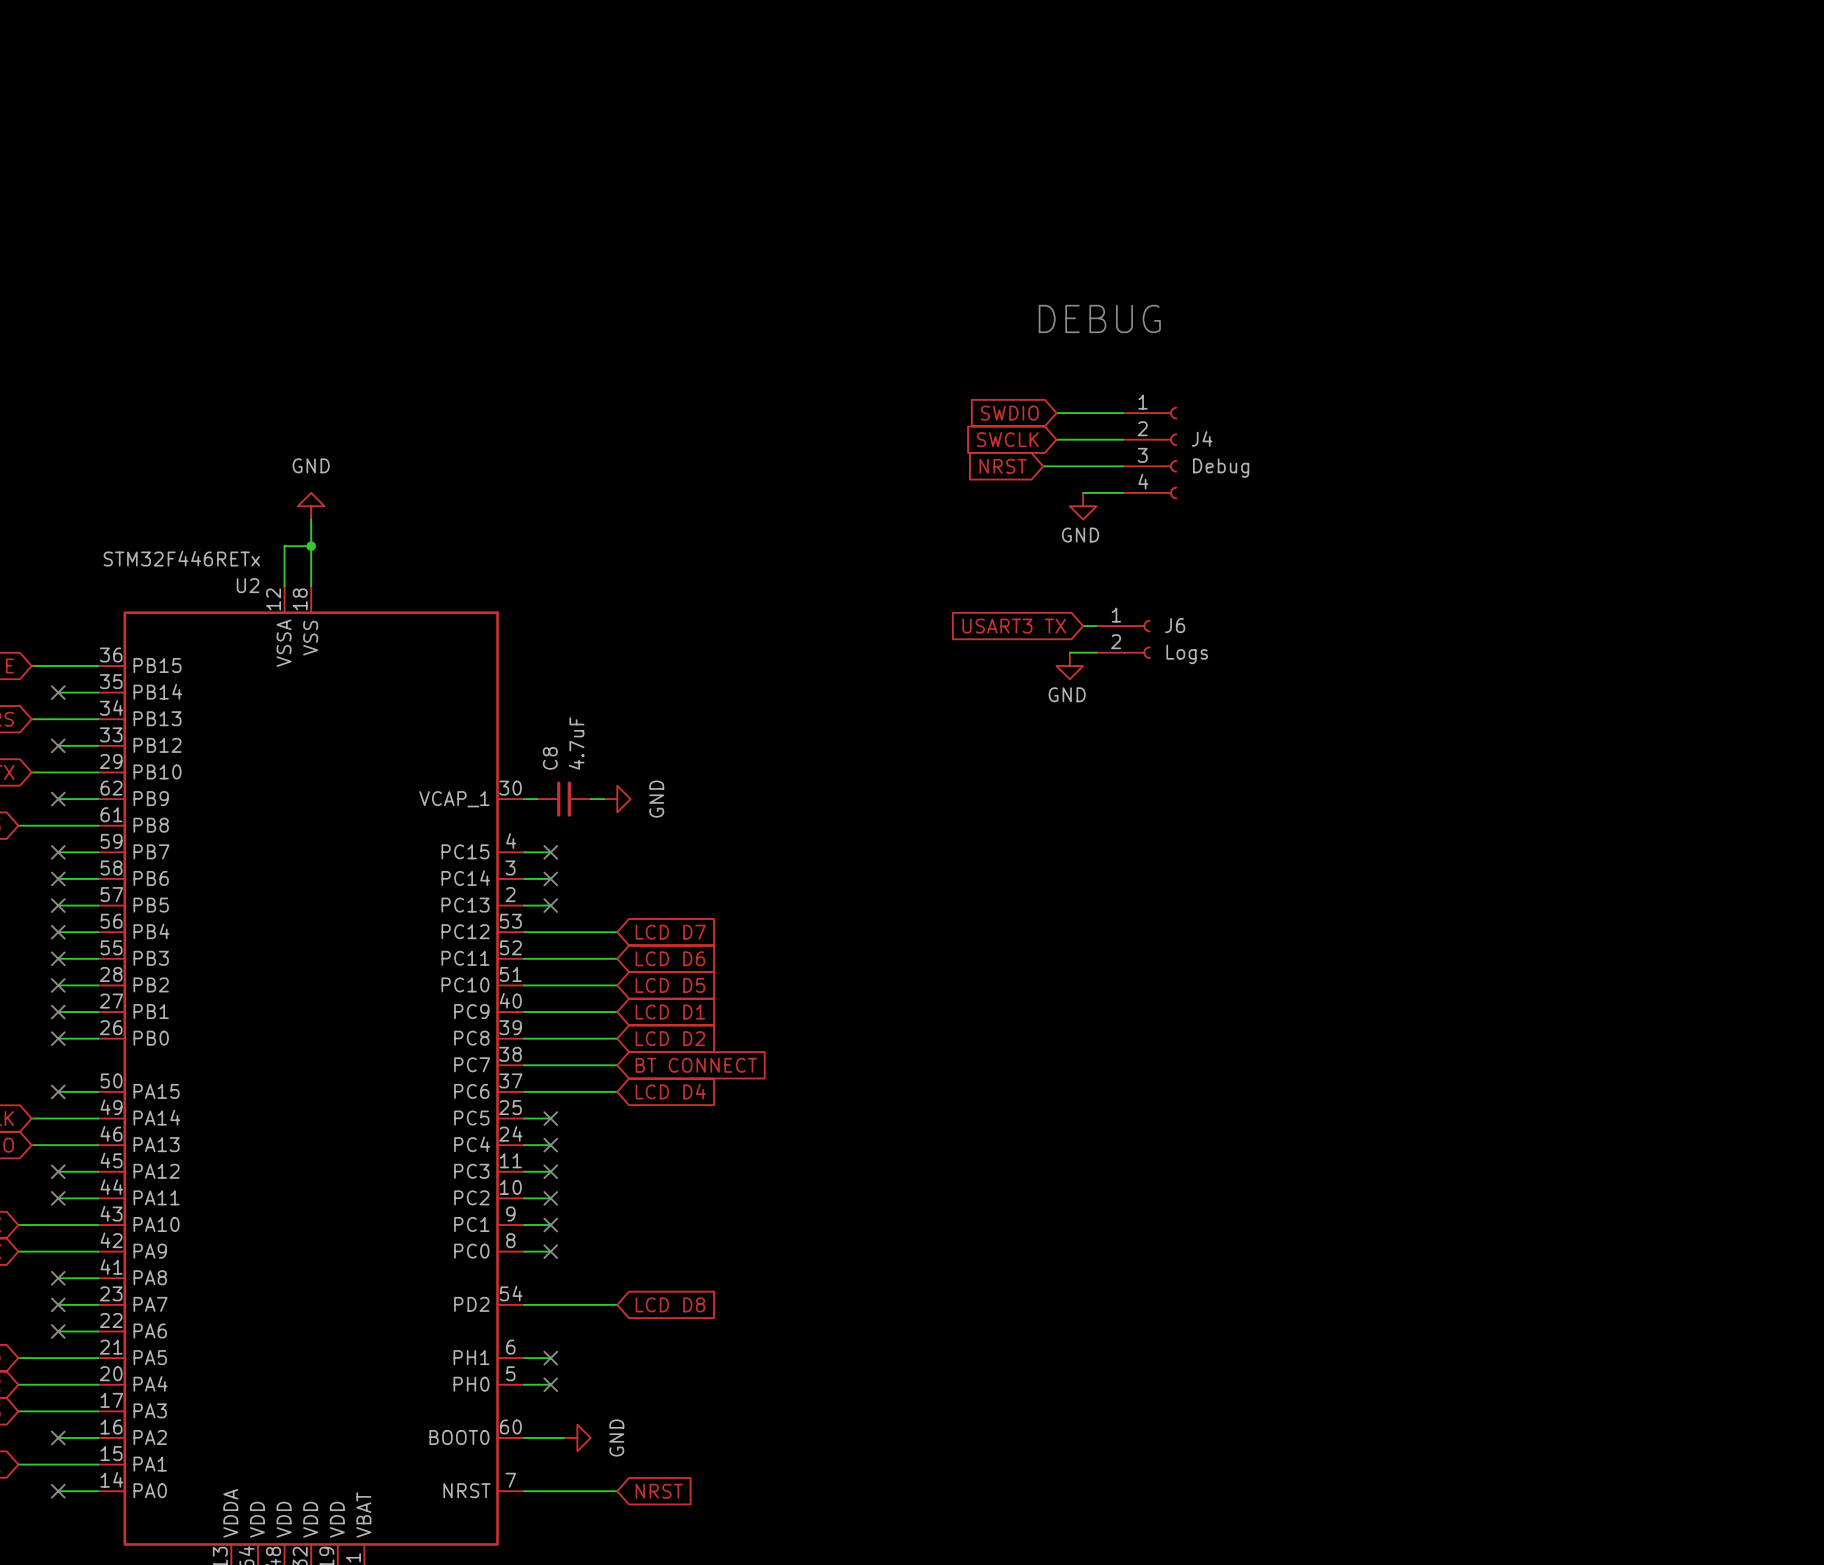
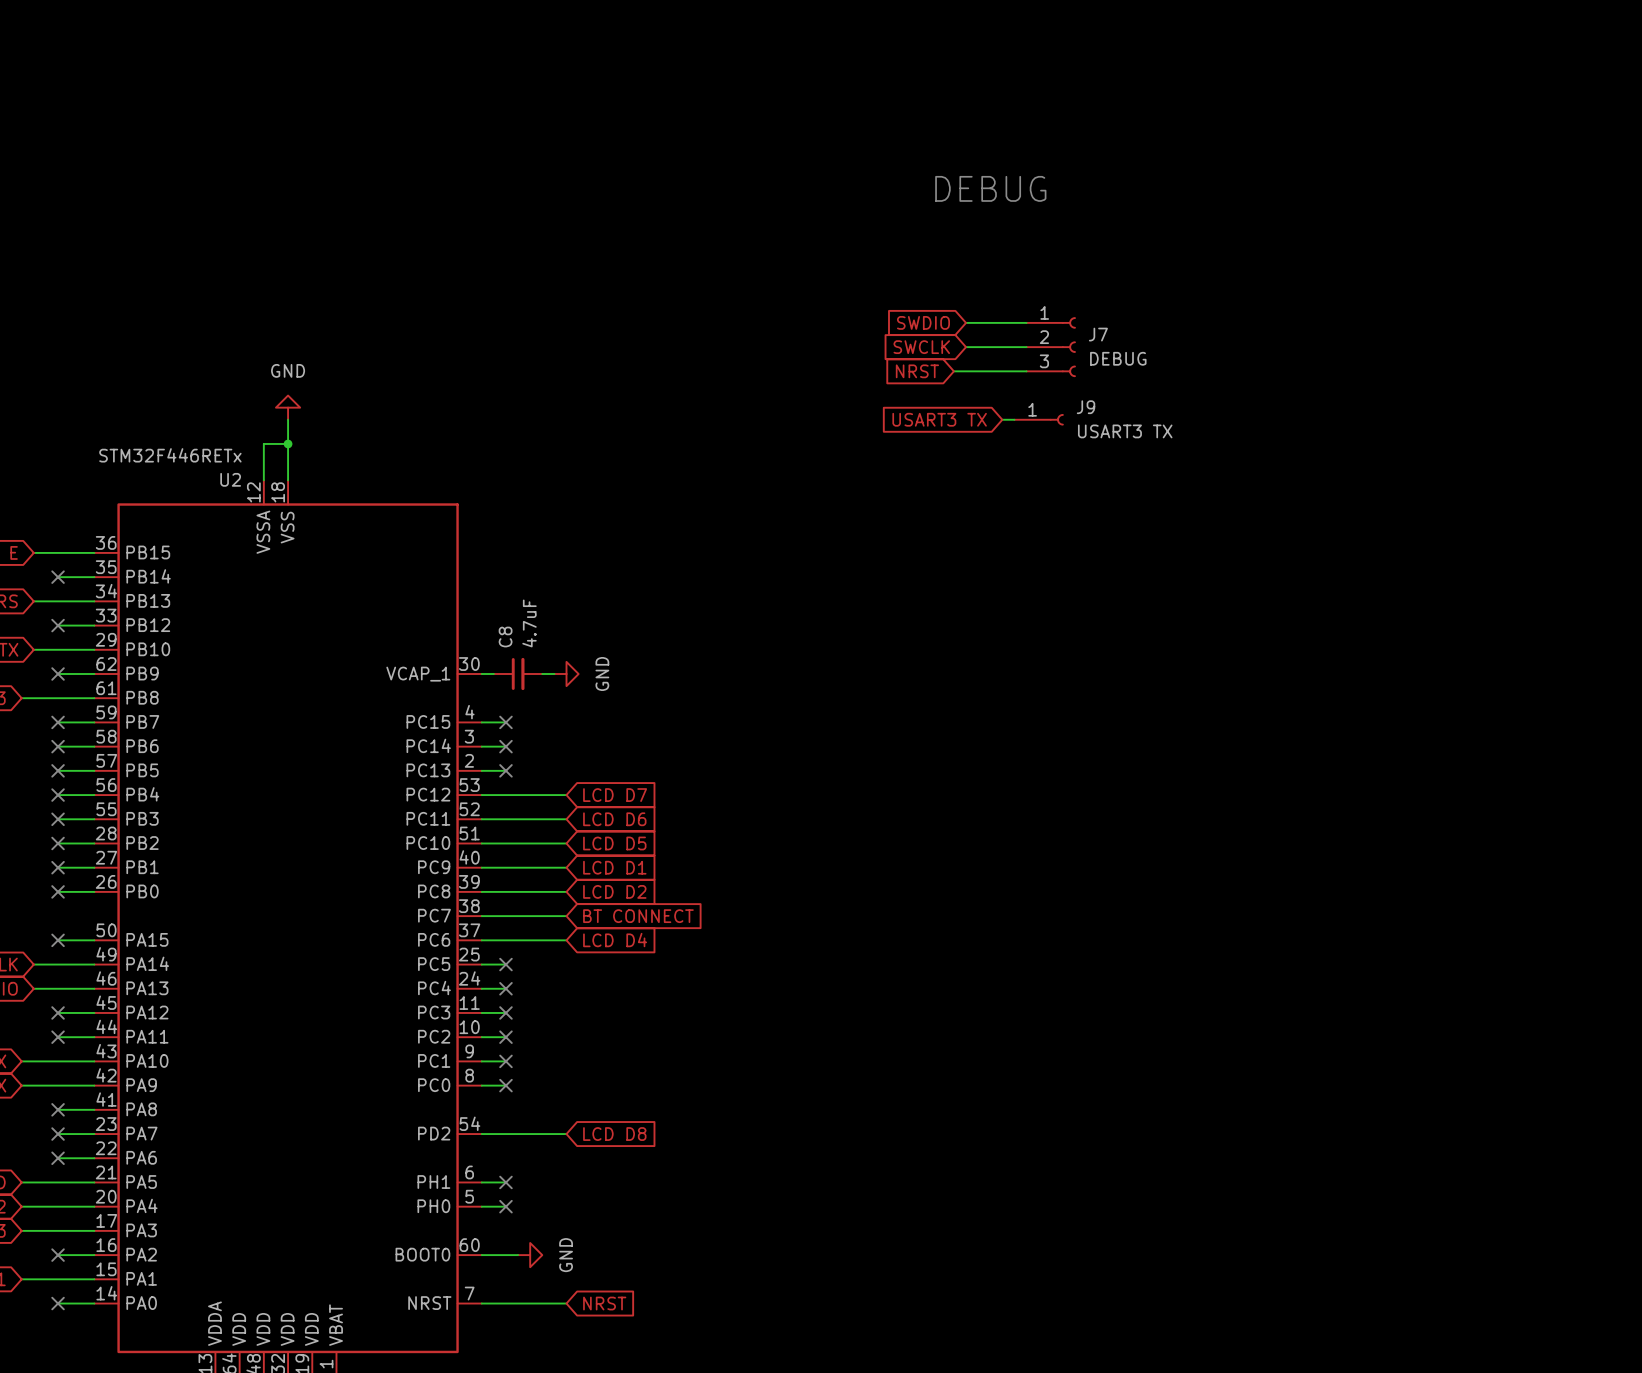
text position: DEBUG (1099, 318) -> DEBUG (990, 188)
J7: none -> DEBUG (1051, 347)
J4: Debug (1150, 453) -> none
wire: (1083, 492) (1123, 492) -> none
power symbol: GND (1083, 506) -> none
J9: none -> USART3 TX (1039, 419)
global label position: USART3 TX (1014, 626) -> USART3 TX (939, 419)
wire: (1083, 626) (1096, 626) -> (1002, 419) (1014, 419)
J6: Logs (1123, 639) -> none
wire: (1069, 652) (1096, 652) -> none
power symbol: GND (1069, 665) -> none

